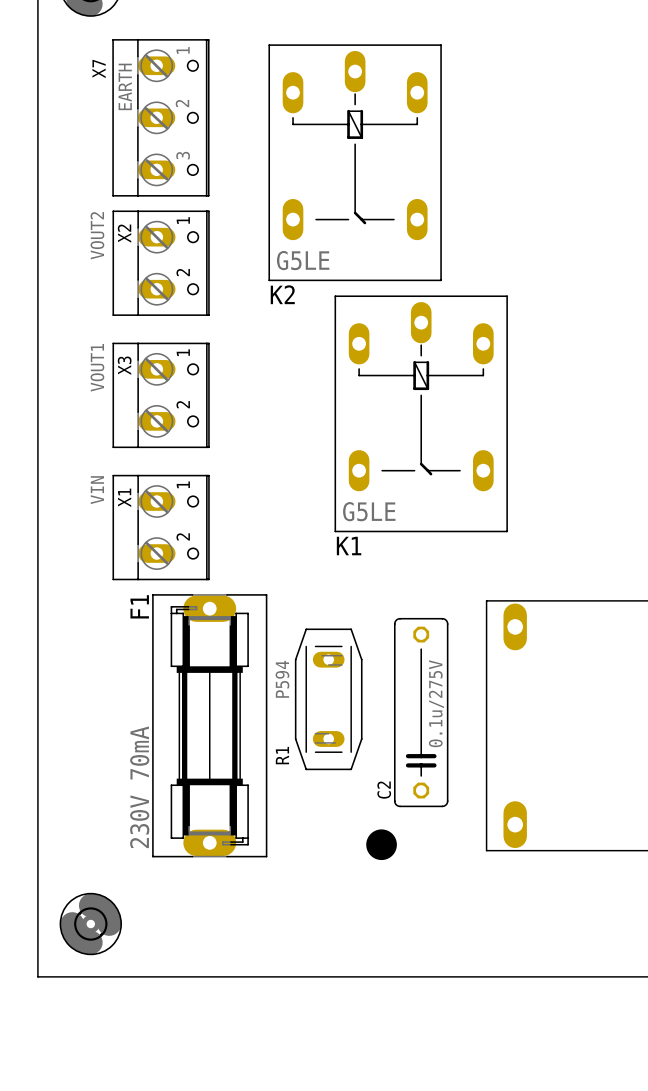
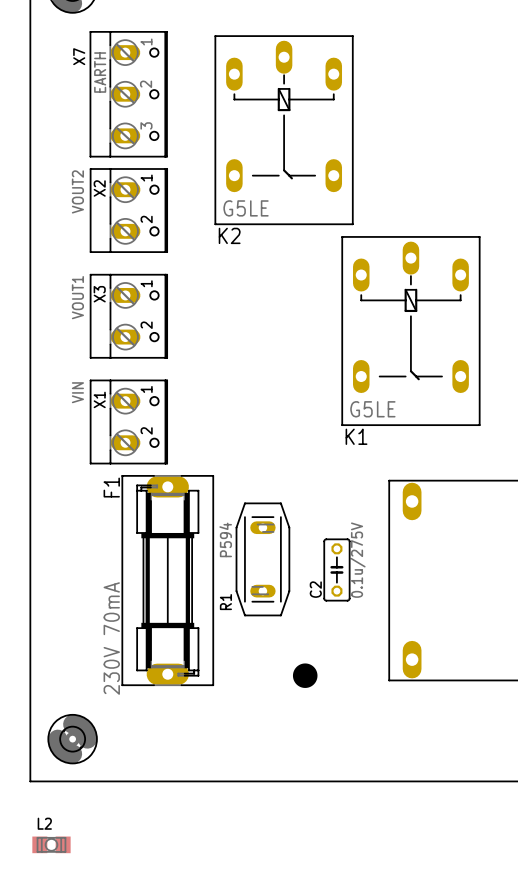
K1 position: (421, 413) -> (410, 331)
C2 footprint: [393, 617, 449, 808] -> [323, 538, 351, 602]
C2 name position: C2 (384, 790) -> C2 (315, 589)
L2: none -> (51, 844)

